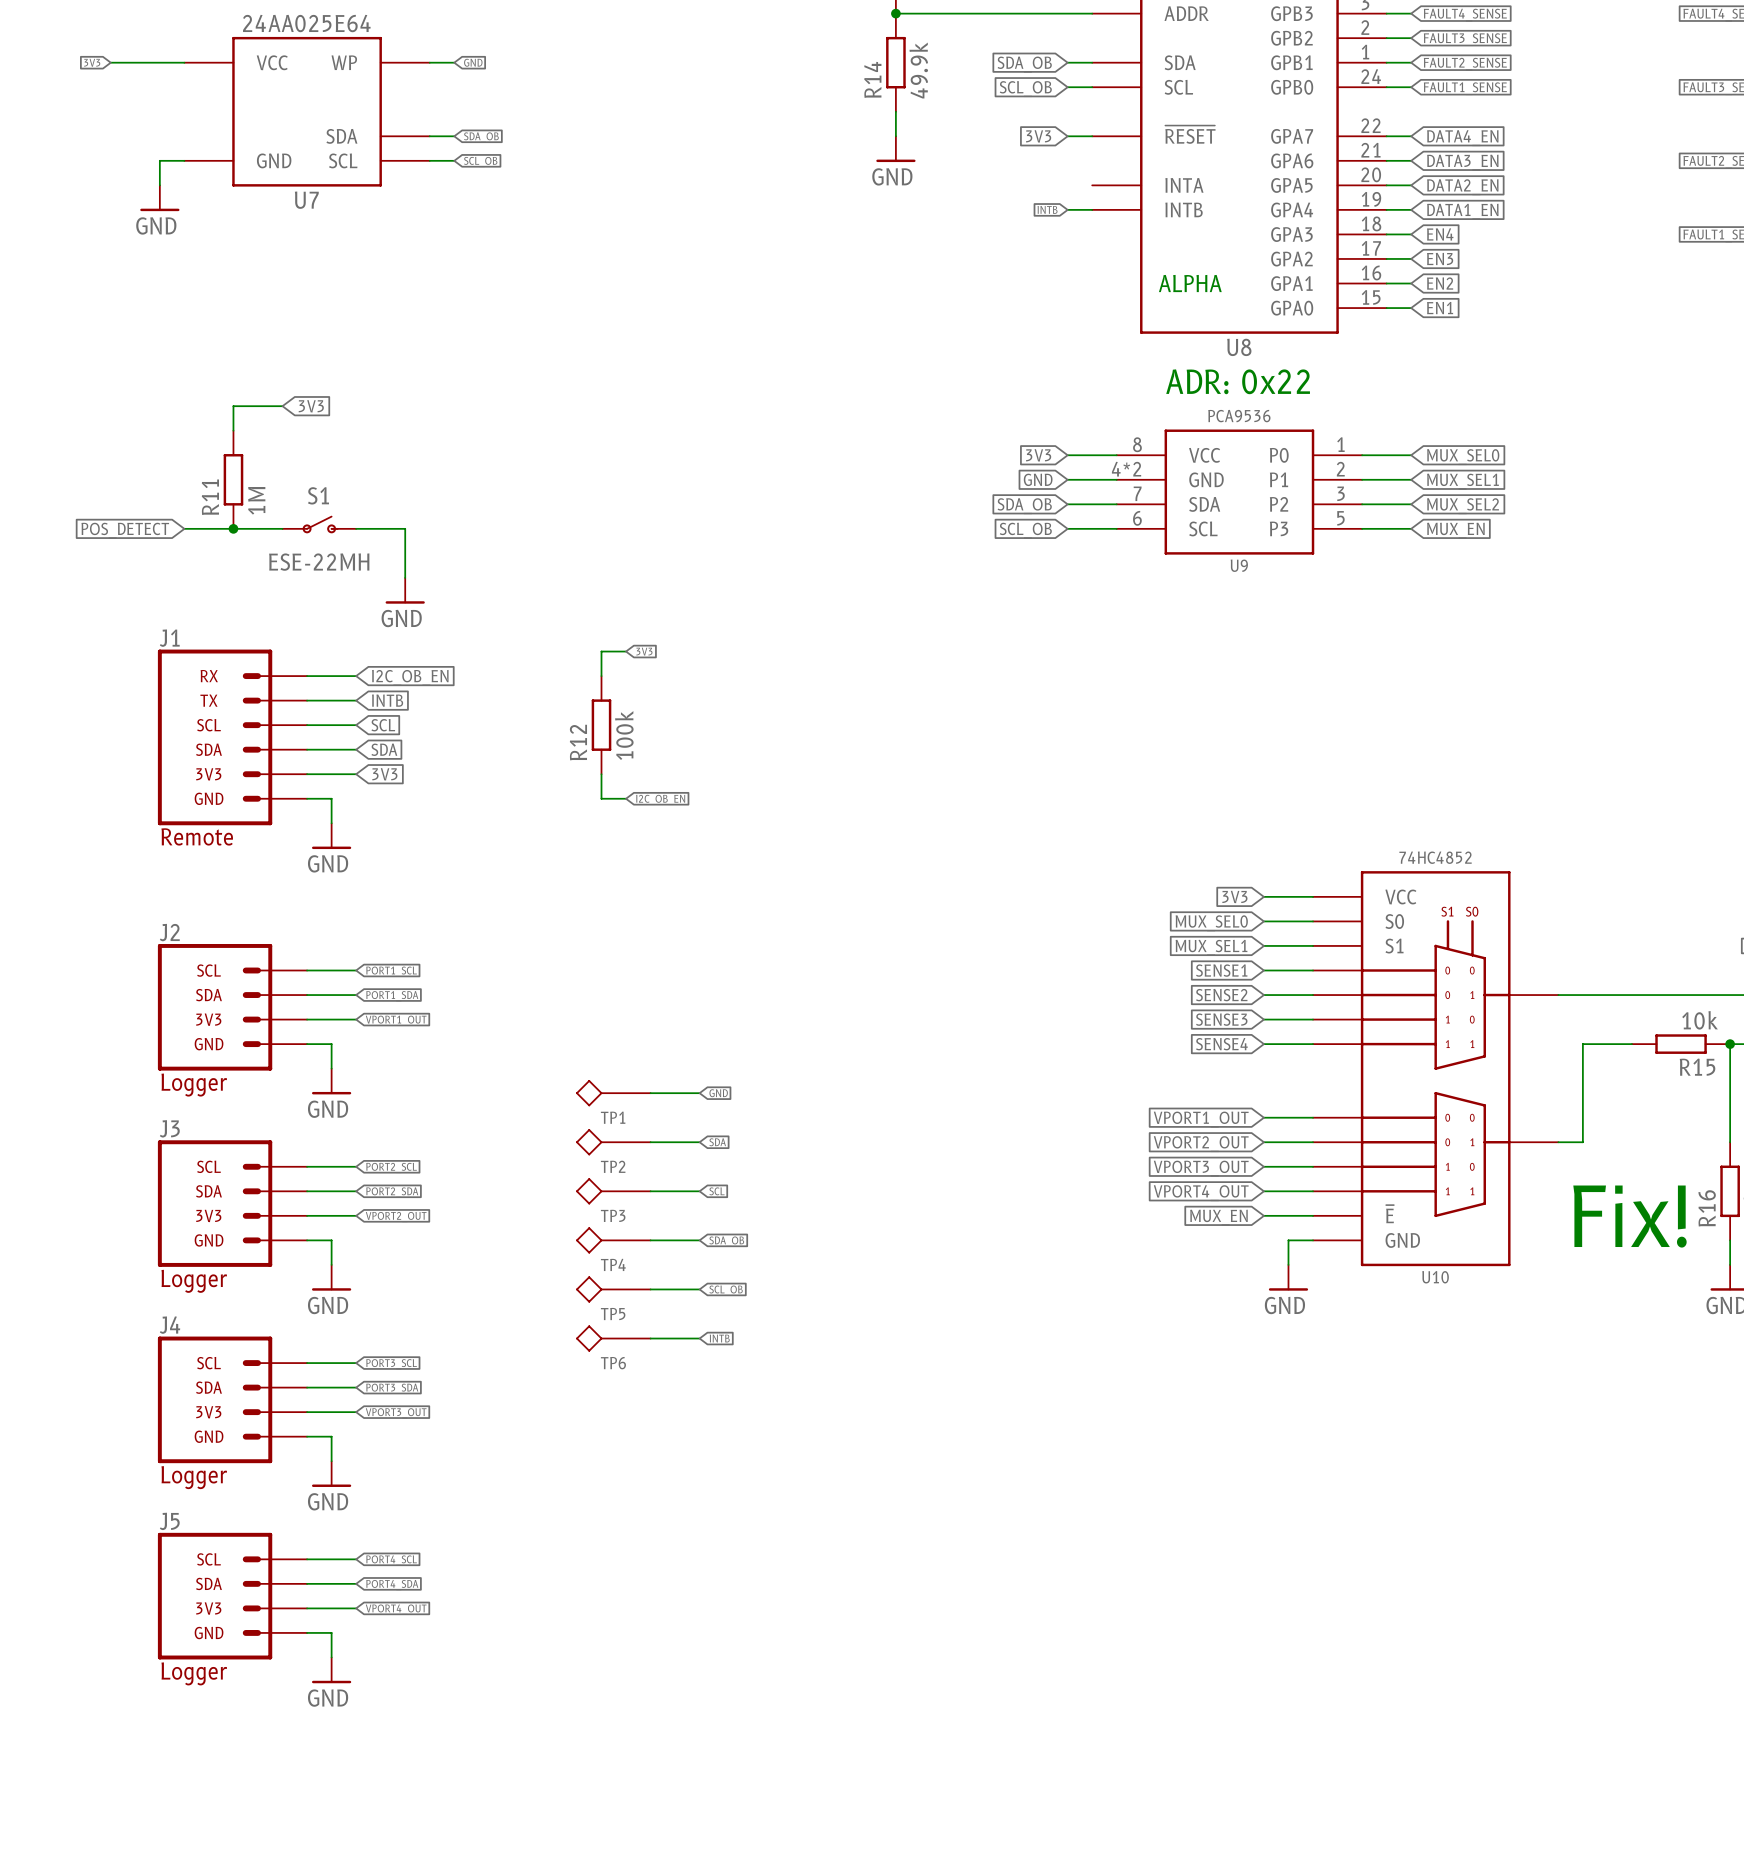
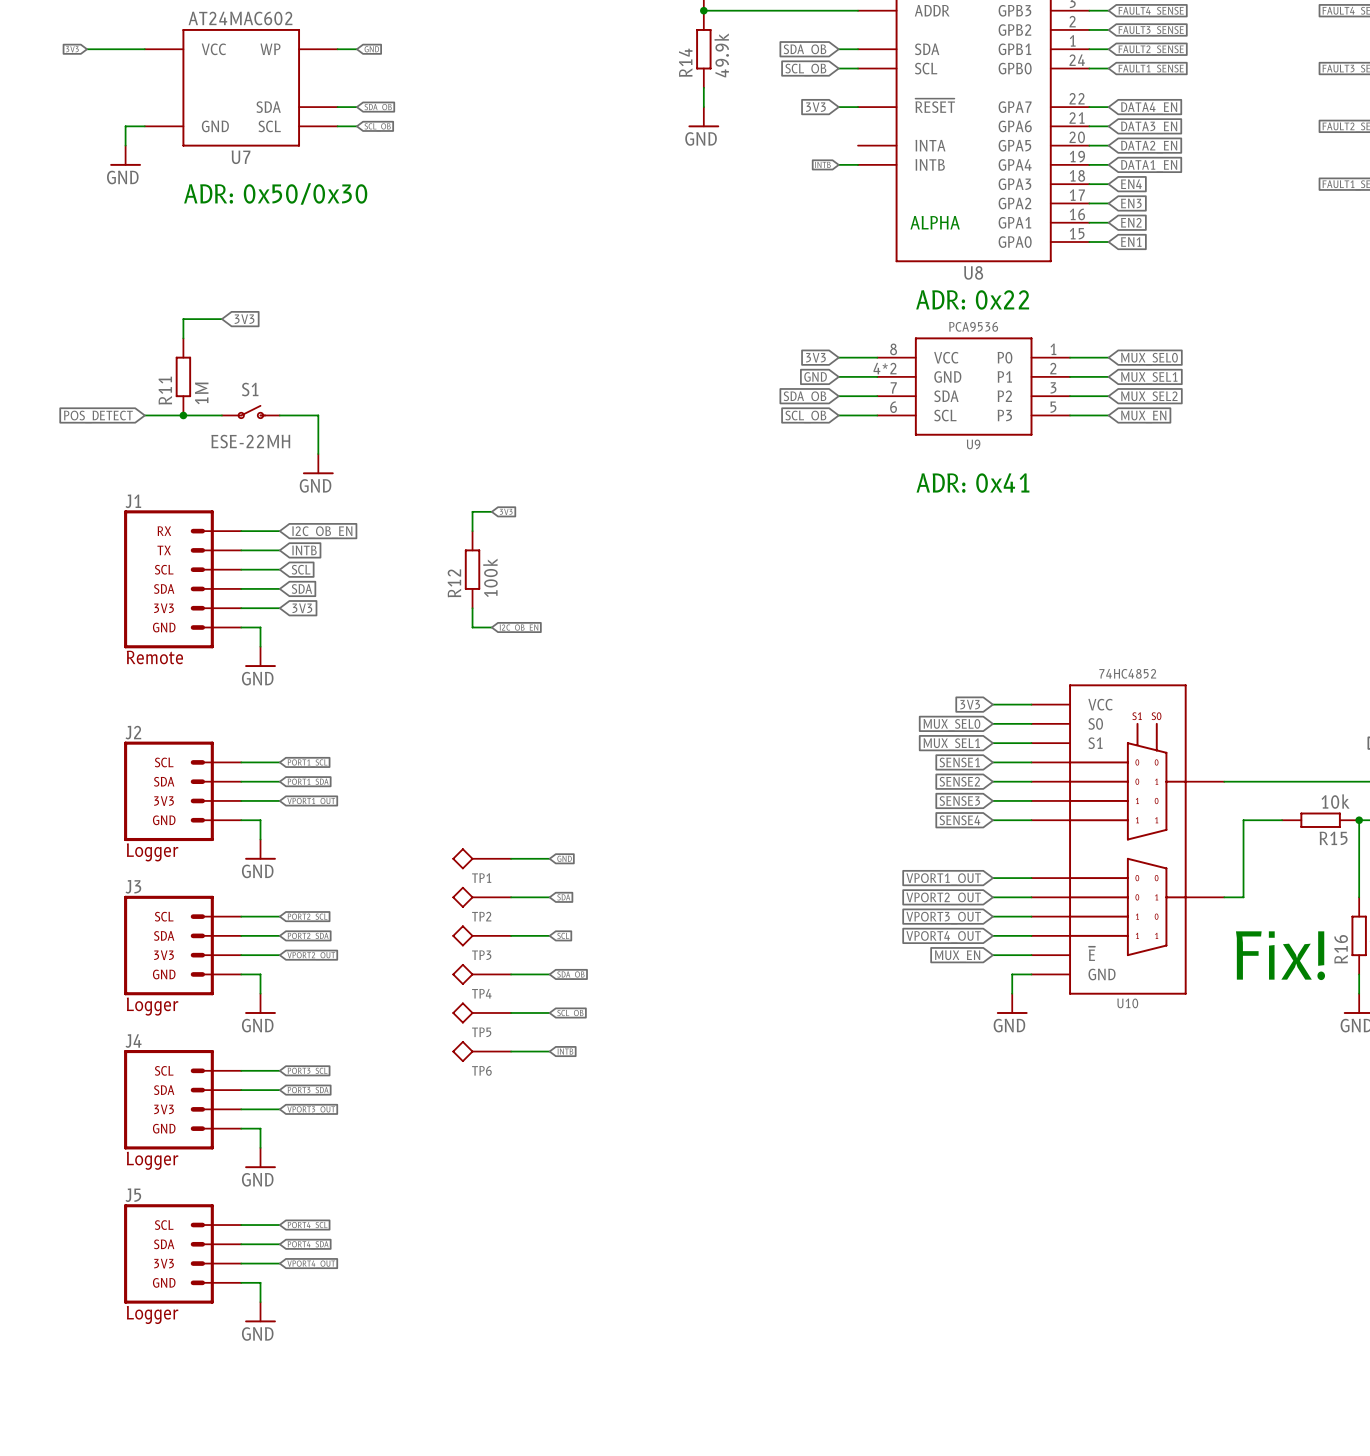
U7 text: 24AA025E64 (306, 23) -> AT24MAC602 (240, 18)
text: none -> ADR: 0x50/0x30 (275, 193)
text: none -> ADR: 0x41 (972, 483)

